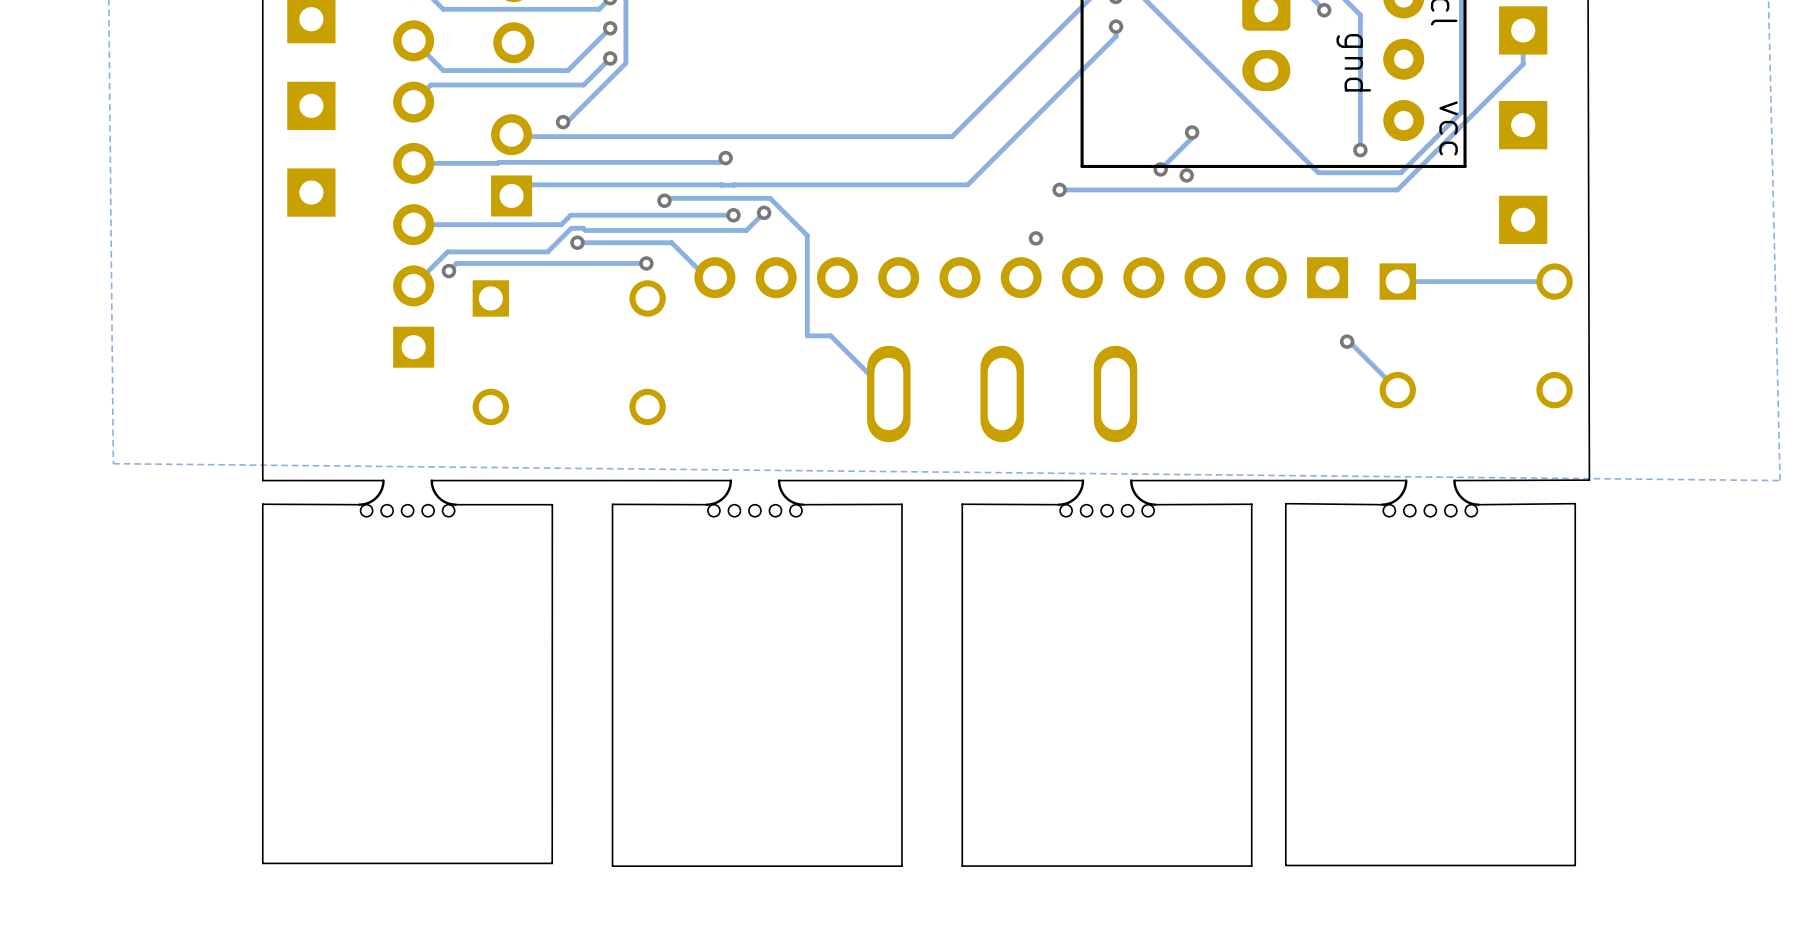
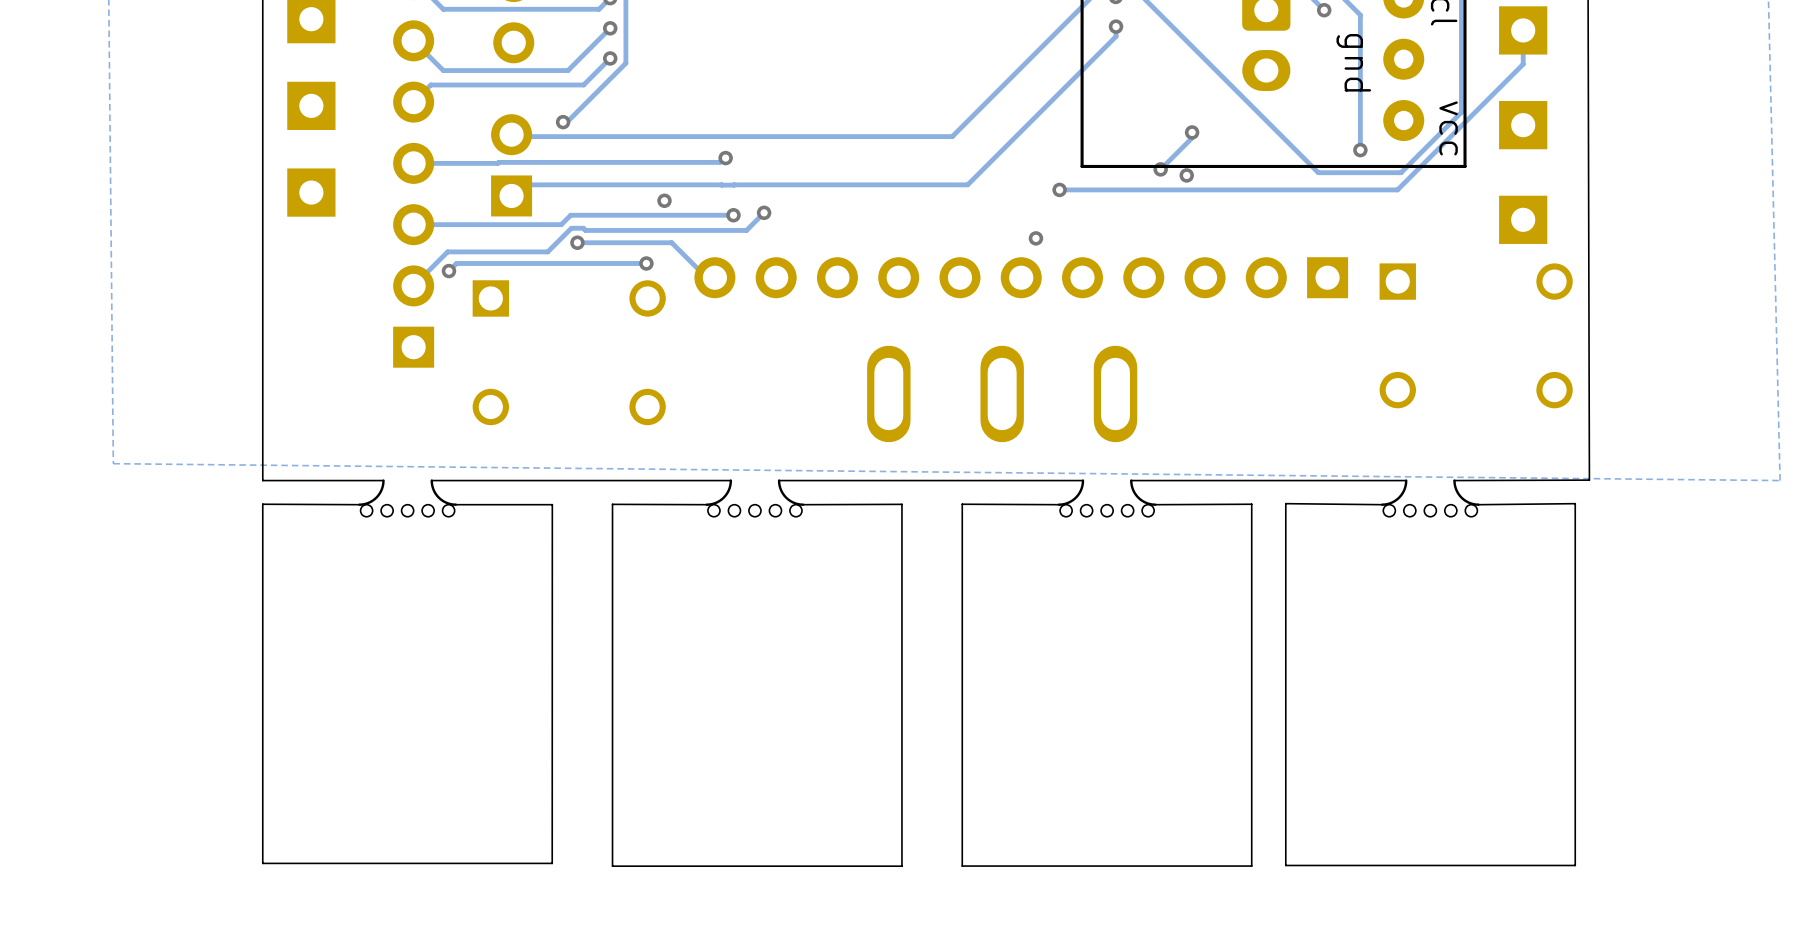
track: (664, 200) (666, 198) (770, 198) (807, 235) (807, 335) (830, 335) (888, 393) -> none
track: (1554, 281) (1397, 281) -> none
track: (1347, 341) (1349, 341) (1397, 390) -> none
via: (1347, 341) -> none

